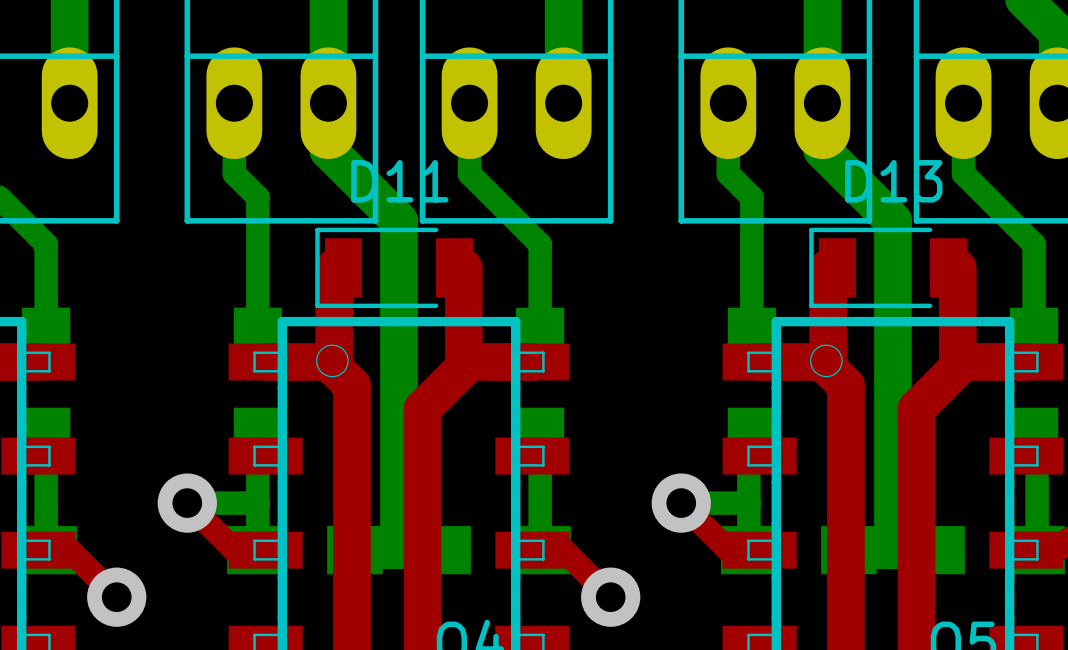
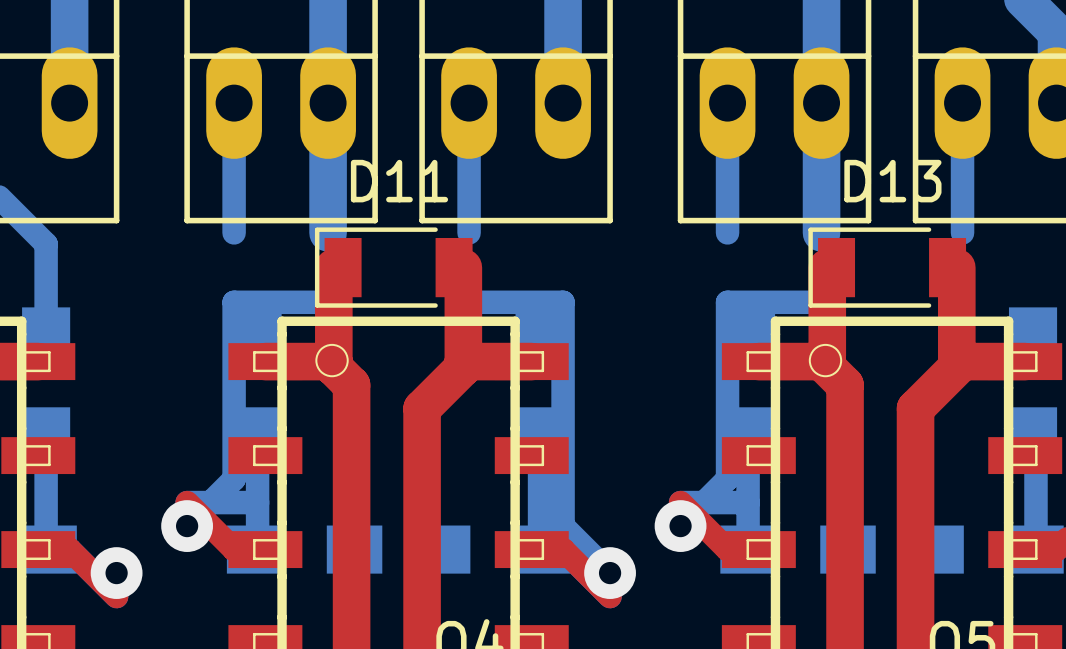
bottom track: (328, 150) (399, 220) (399, 550) -> (328, 150) (328, 232)
bottom track: (822, 150) (892, 220) (892, 550) -> (821, 150) (821, 232)
bottom track: (234, 173) (257, 197) (257, 335) -> (234, 173) (234, 232)
bottom track: (469, 173) (540, 244) (540, 335) -> (469, 173) (469, 232)
bottom track: (728, 173) (751, 197) (751, 335) -> (727, 173) (727, 232)
bottom track: (963, 173) (1034, 244) (1034, 335) -> (962, 173) (962, 232)
bottom track: none -> (328, 302) (234, 302) (234, 479) (187, 526)
bottom track: none -> (469, 302) (563, 302) (563, 526) (610, 573)
bottom track: none -> (821, 302) (727, 302) (727, 479) (680, 526)
via position: (187, 503) -> (187, 526)
via position: (681, 503) -> (680, 526)
via position: (116, 597) -> (116, 573)
via position: (610, 597) -> (610, 573)

